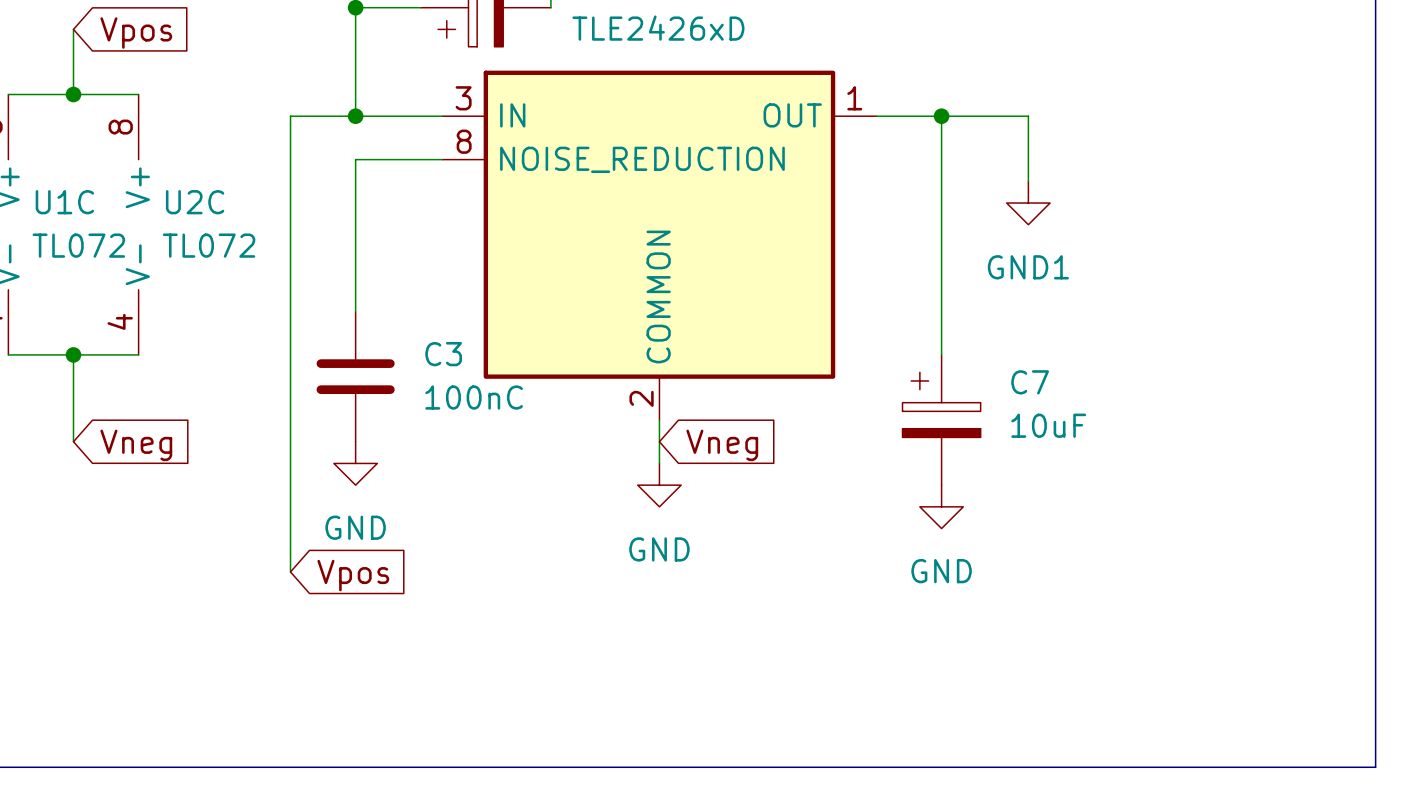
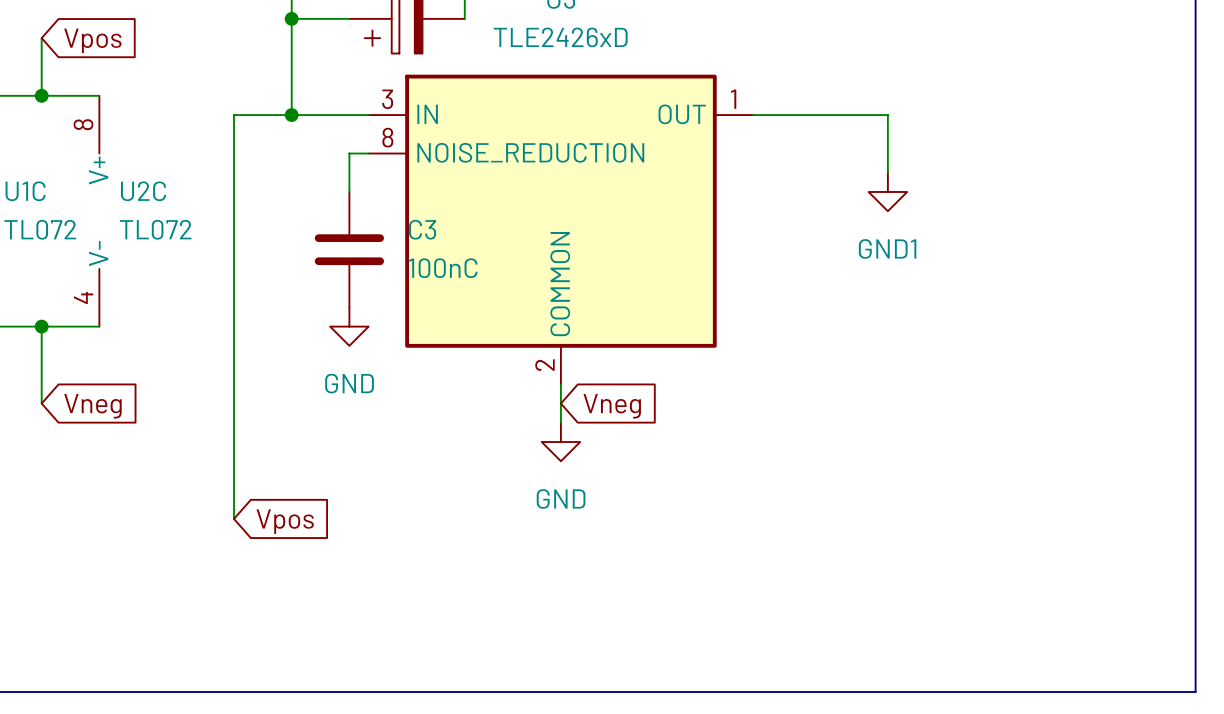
wire: (941, 116) (941, 354) -> none
junction: (941, 116) -> none
wire: (420, 159) (355, 159) (355, 311) -> (349, 153) (349, 191)
C3 position: (355, 376) -> (349, 249)
C7: 10uF (941, 420) -> none
power symbol position: GND (355, 463) -> GND (349, 326)
power symbol: GND (941, 506) -> none

